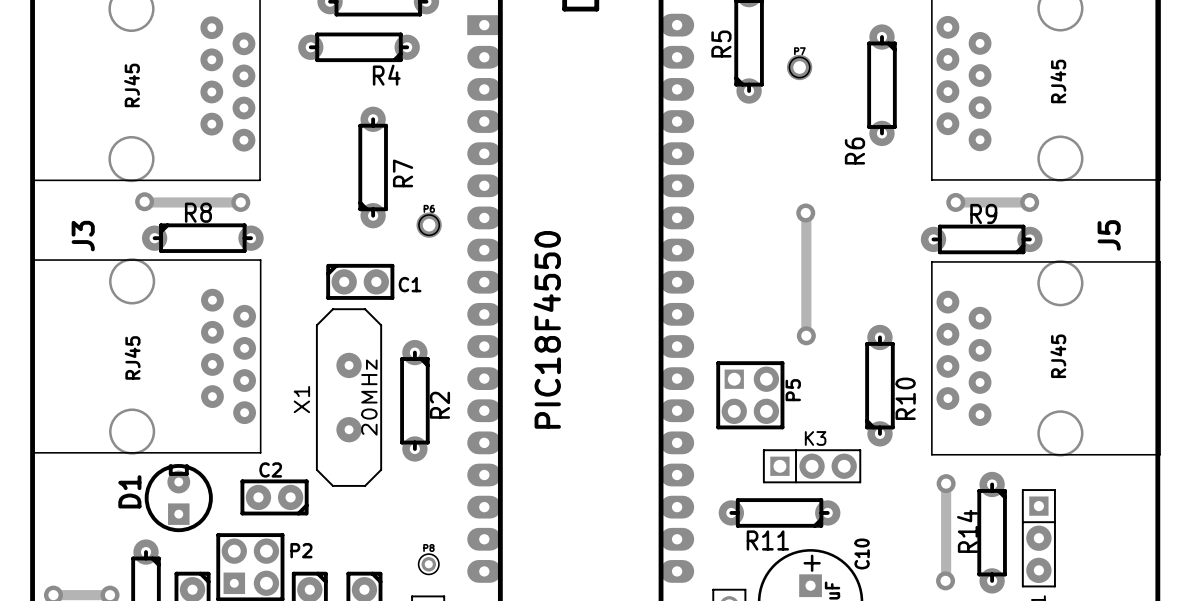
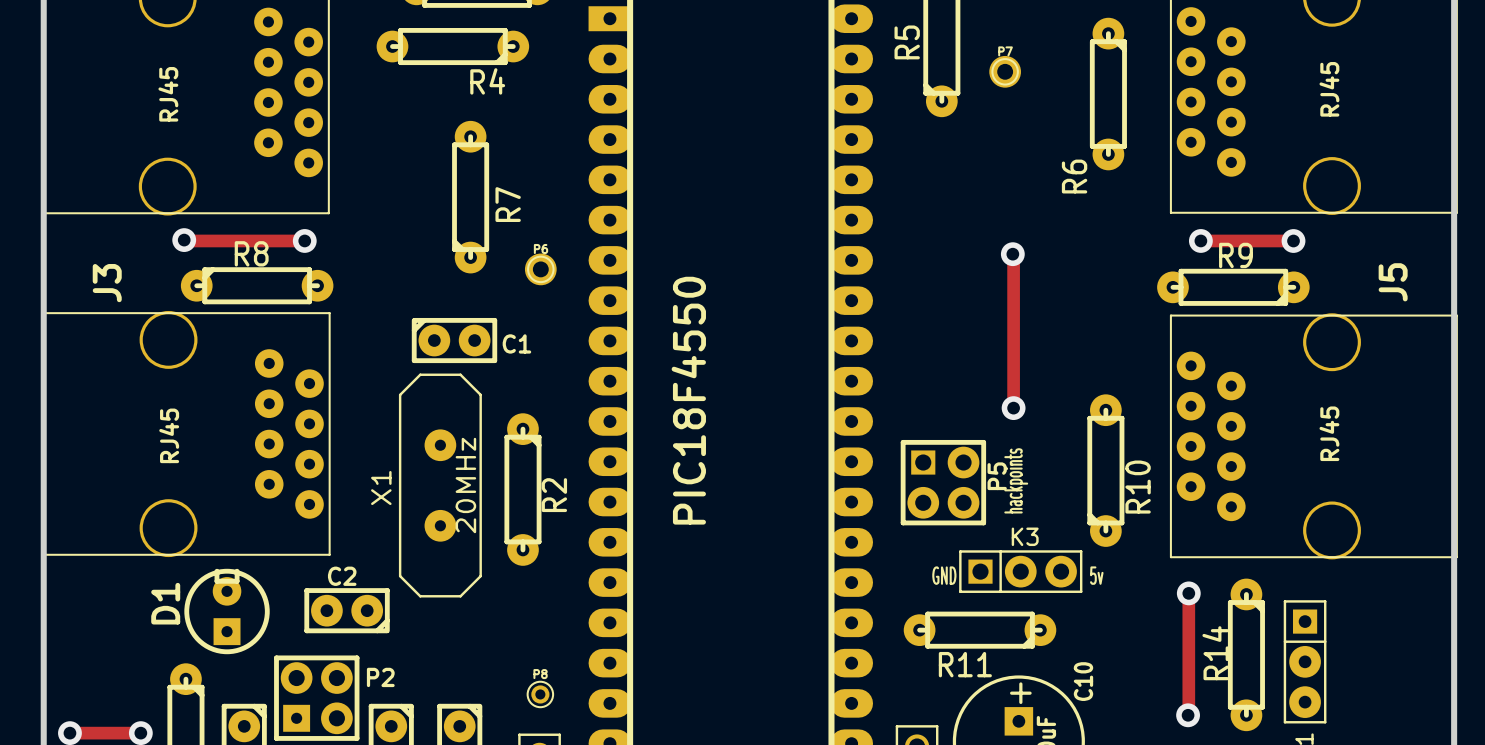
text: none -> hackpoints (1016, 480)
text: none -> GND (944, 575)
text: none -> 5v (1096, 575)

